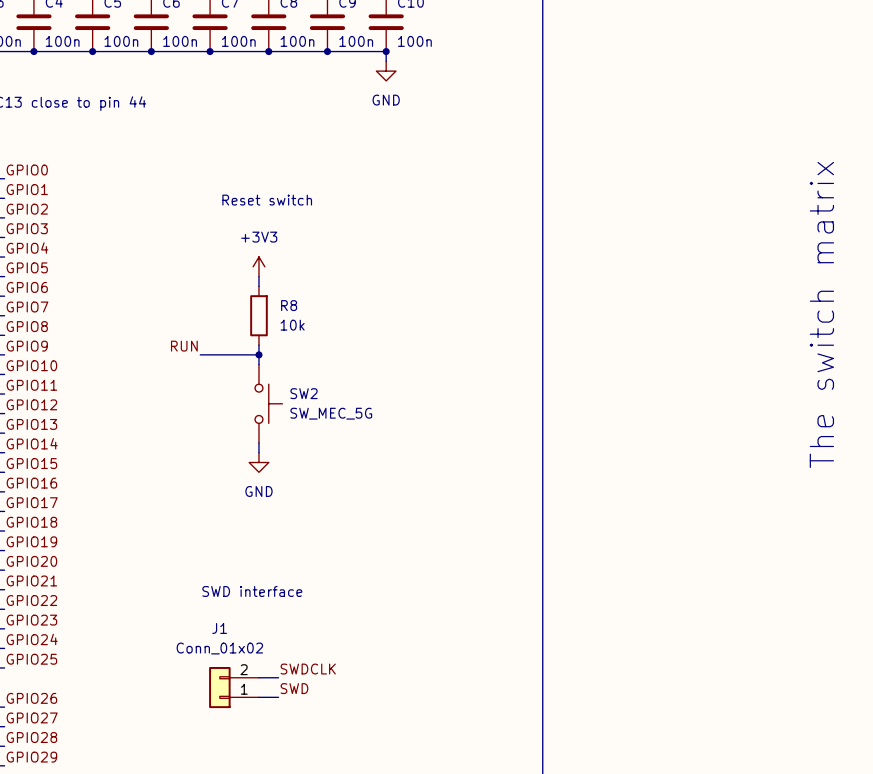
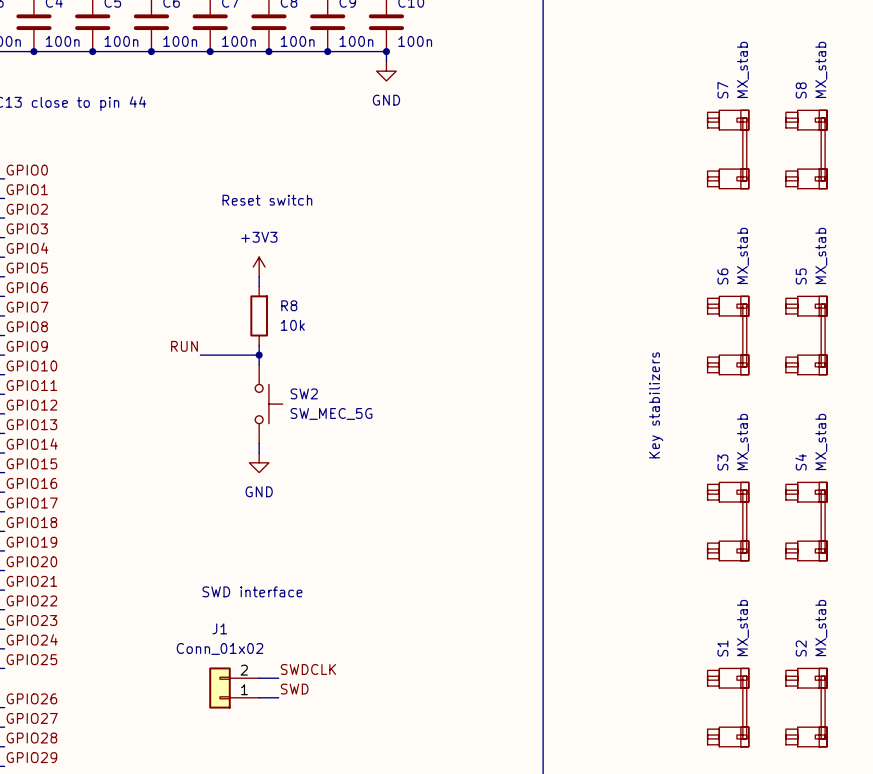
S7: none -> MX_stab (728, 149)
S8: none -> MX_stab (806, 149)
text: The switch matrix (821, 314) -> none
S6: none -> MX_stab (728, 335)
S5: none -> MX_stab (806, 335)
text: none -> Key stabilizers (656, 405)
S3: none -> MX_stab (728, 521)
S4: none -> MX_stab (806, 521)
S1: none -> MX_stab (728, 707)
S2: none -> MX_stab (806, 707)

